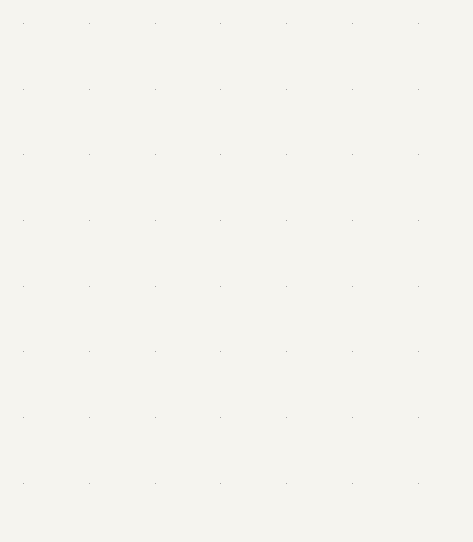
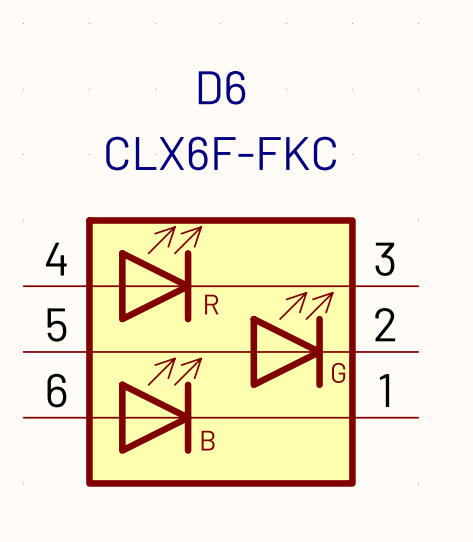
D6: none -> CLX6F-FKC (220, 351)

